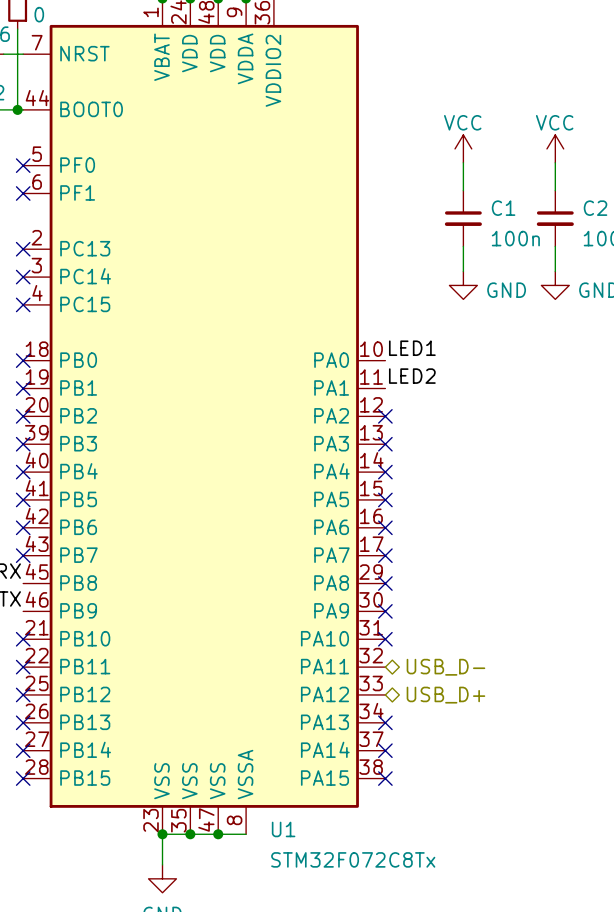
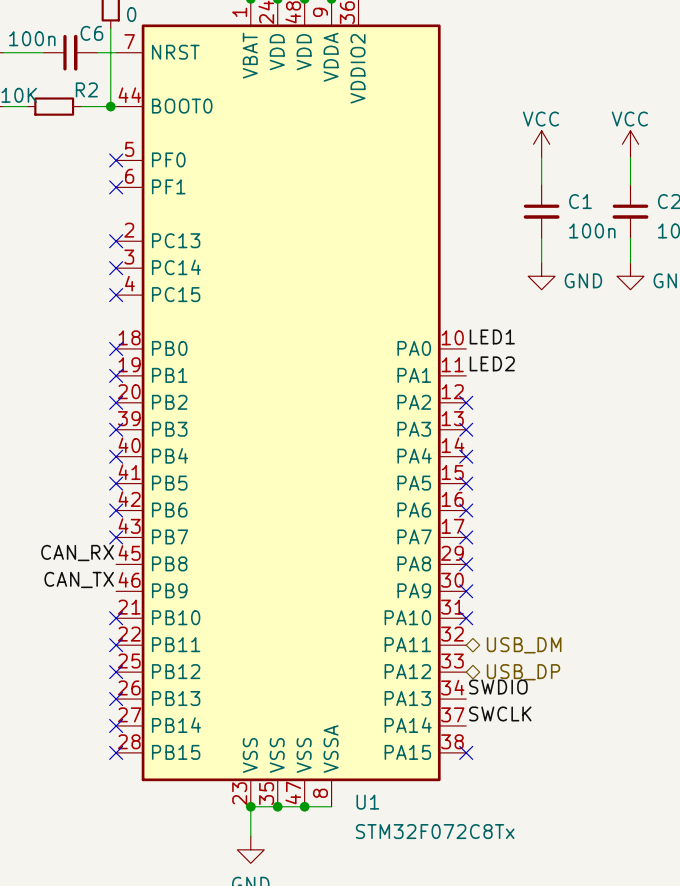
hierarchical label: USB_D- (445, 667) -> USB_DM (524, 645)
hierarchical label: USB_D+ (445, 695) -> USB_DP (523, 672)
label: none -> SWDIO (498, 687)
no-connect mark: (385, 722) -> none
label: none -> SWCLK (500, 713)
no-connect mark: (385, 750) -> none

